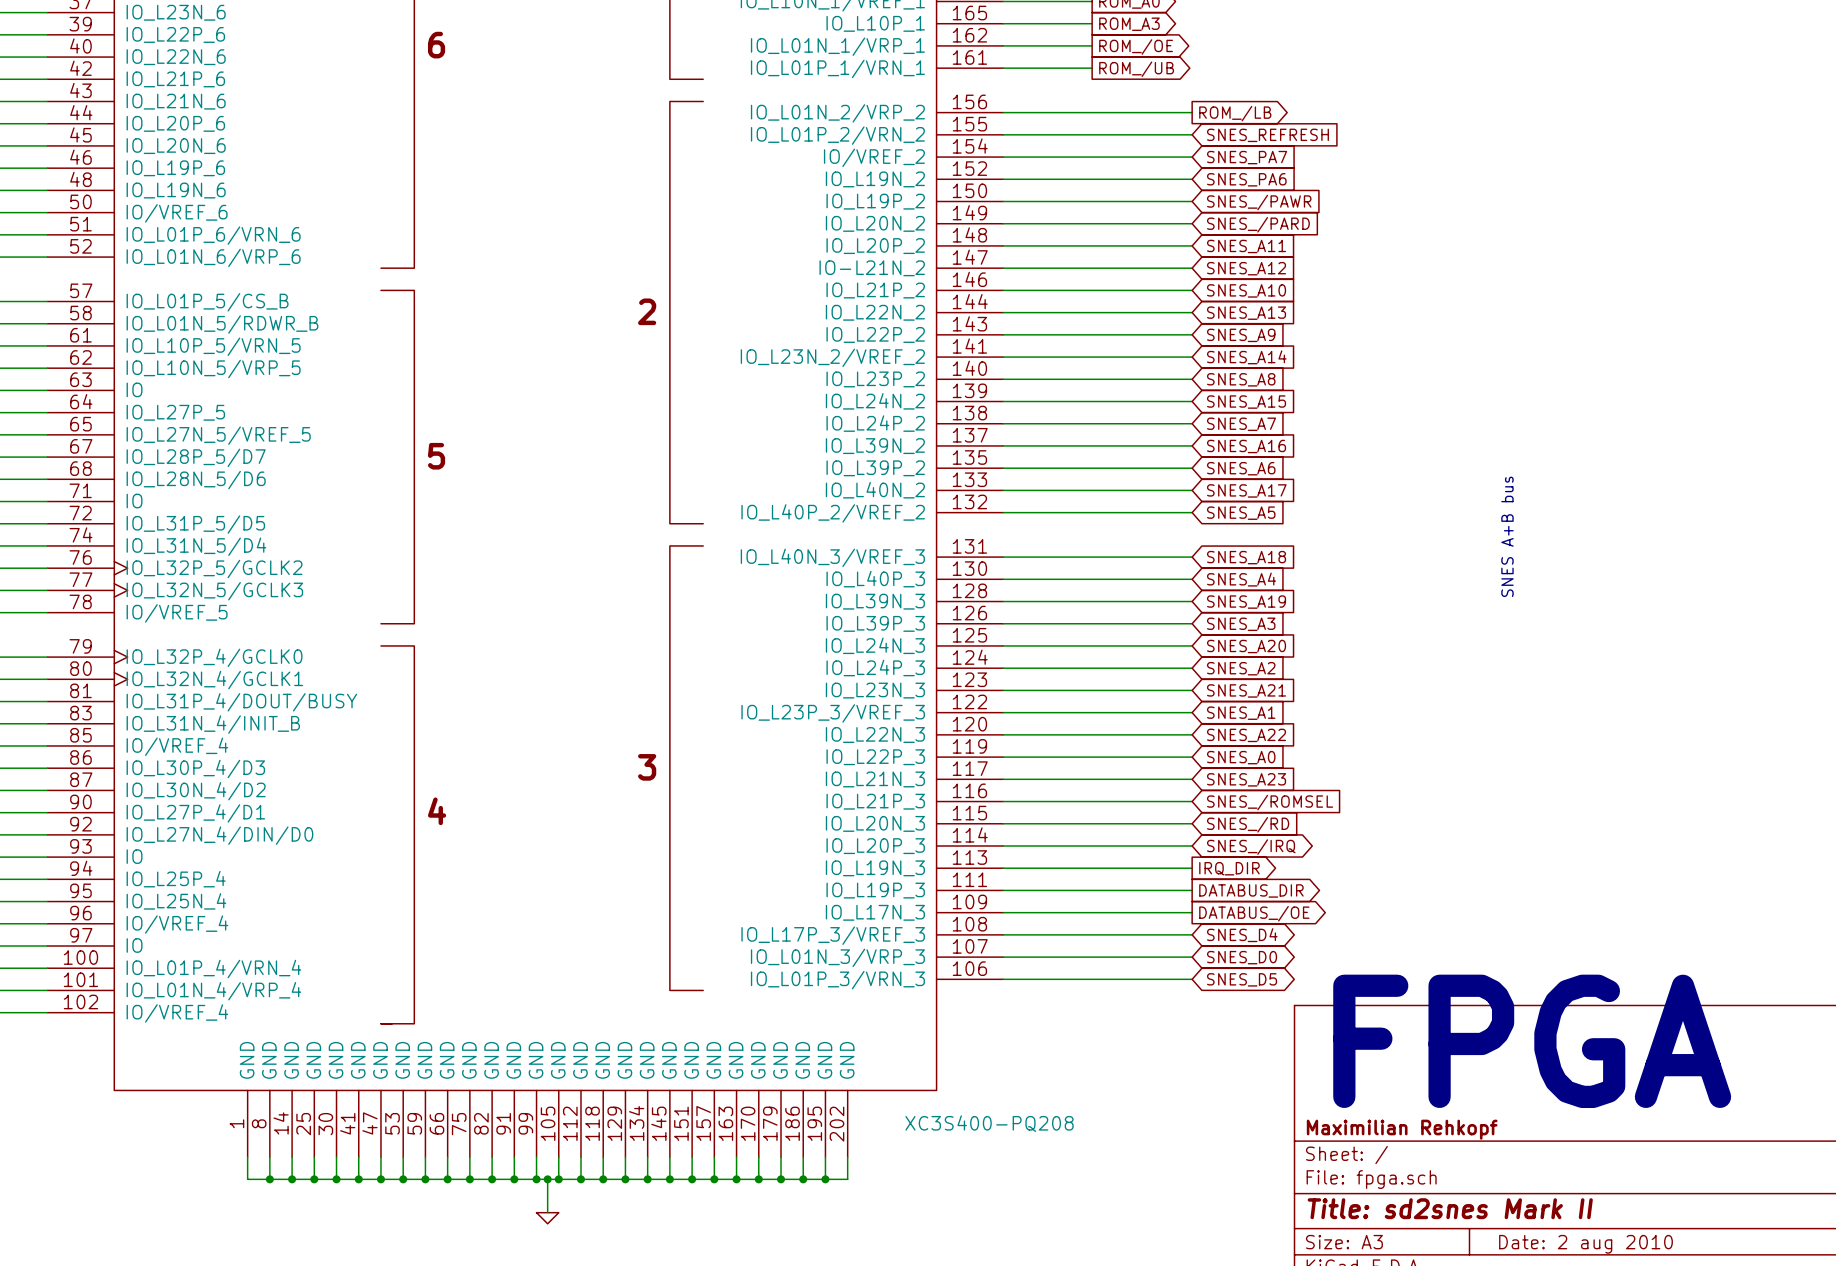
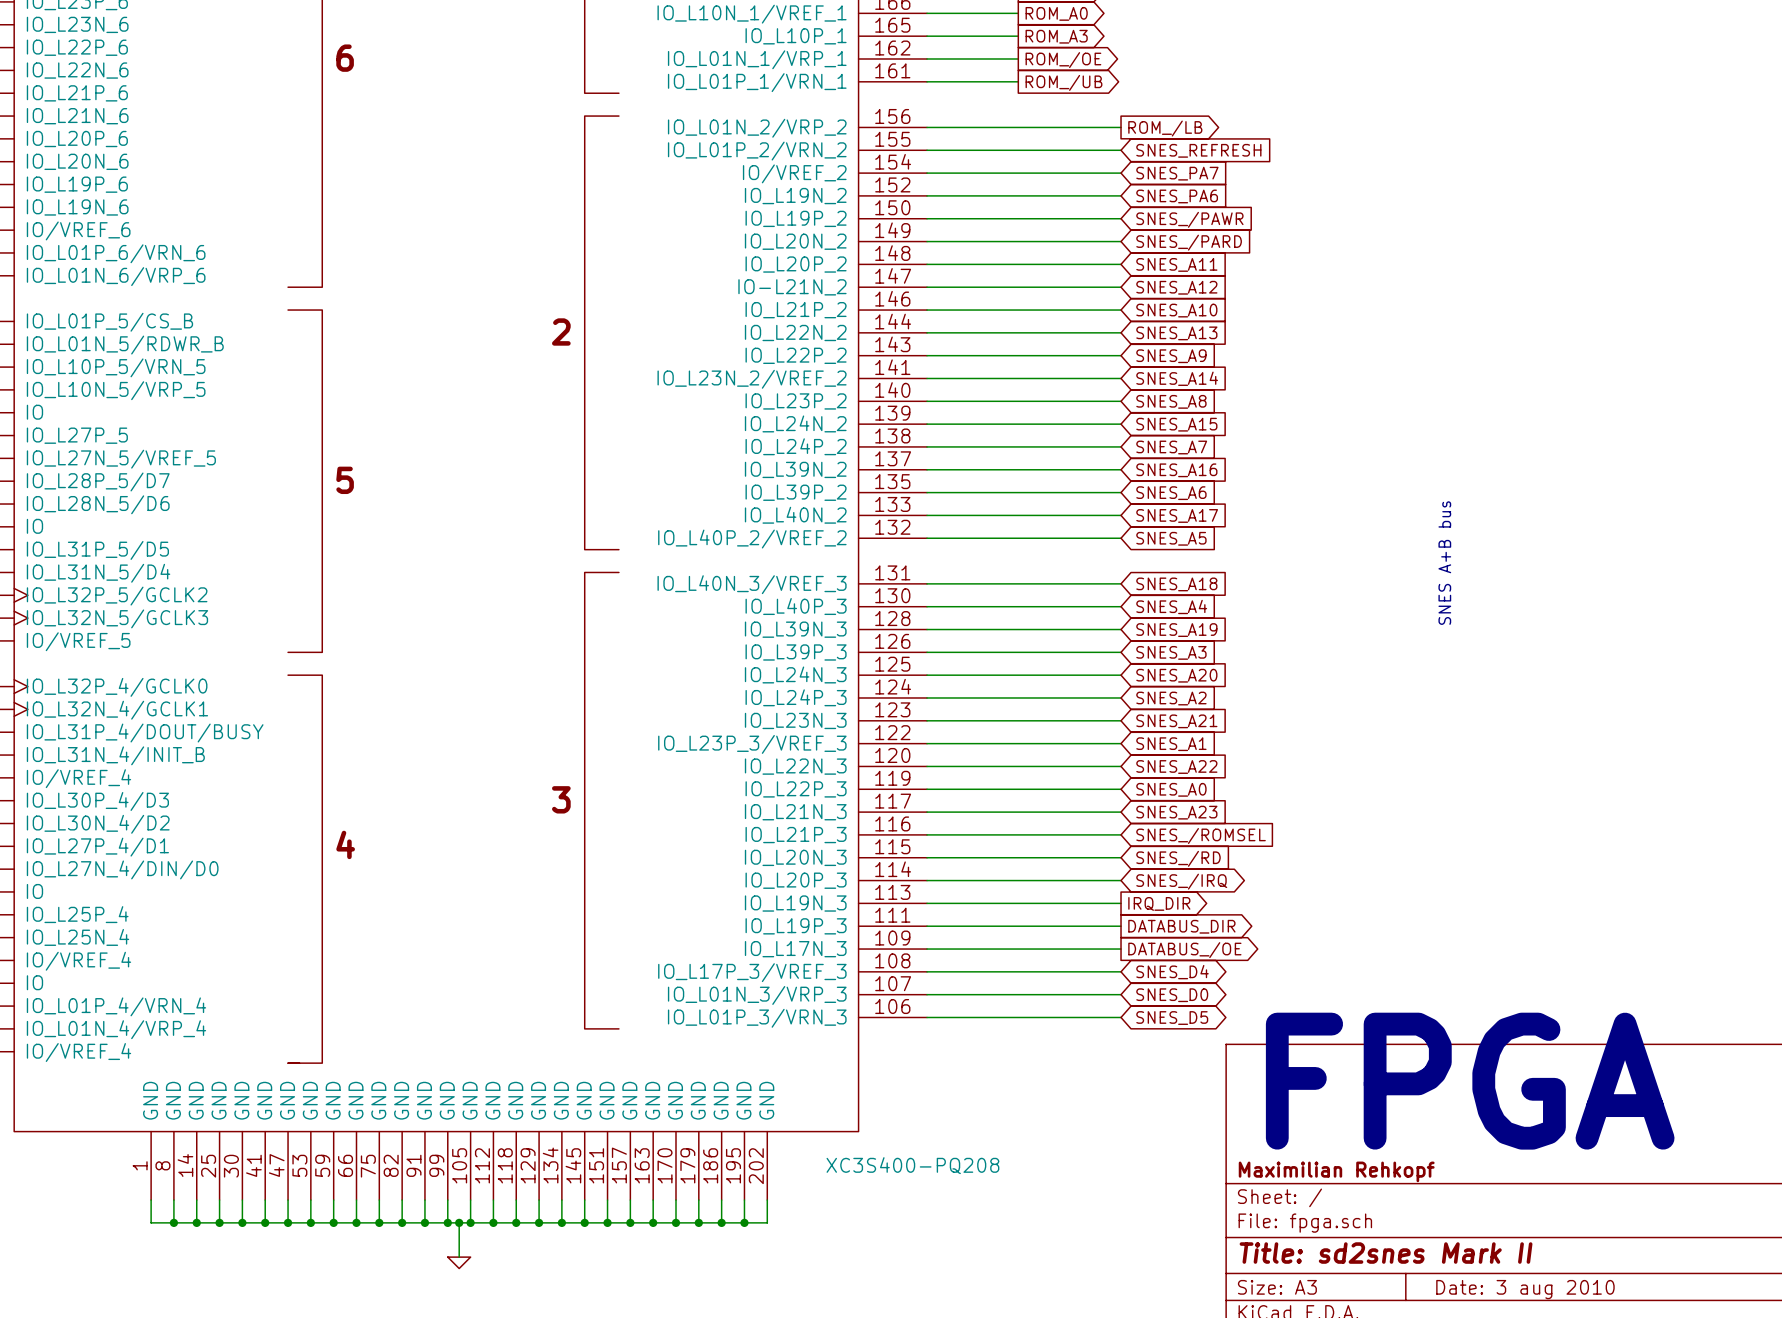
title block: Date: 2 aug 2010 (1585, 1244) -> Date: 3 aug 2010 (1525, 1289)

